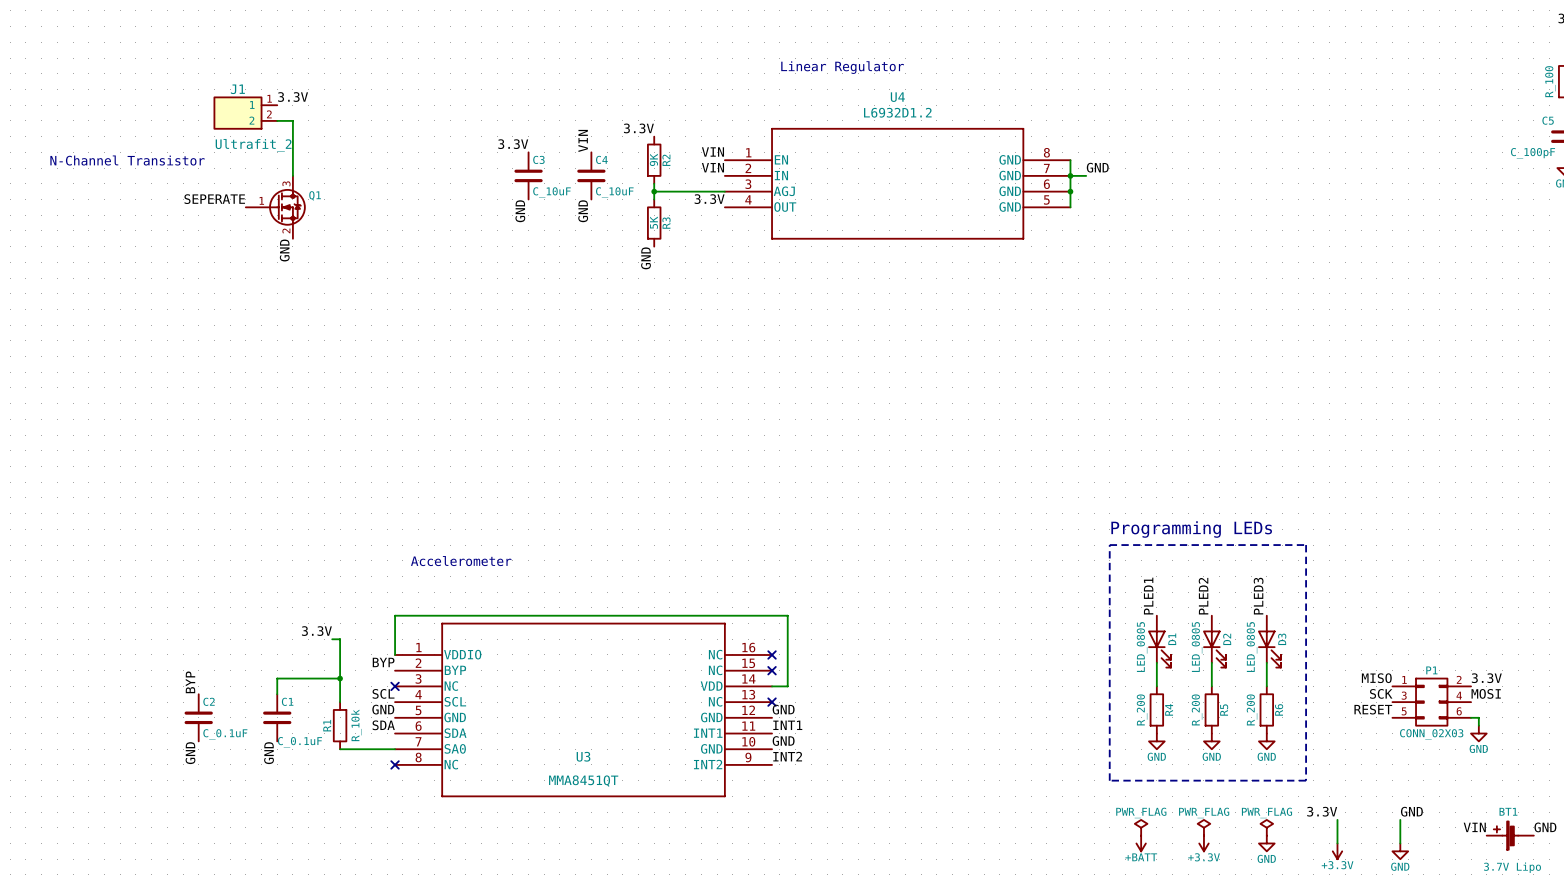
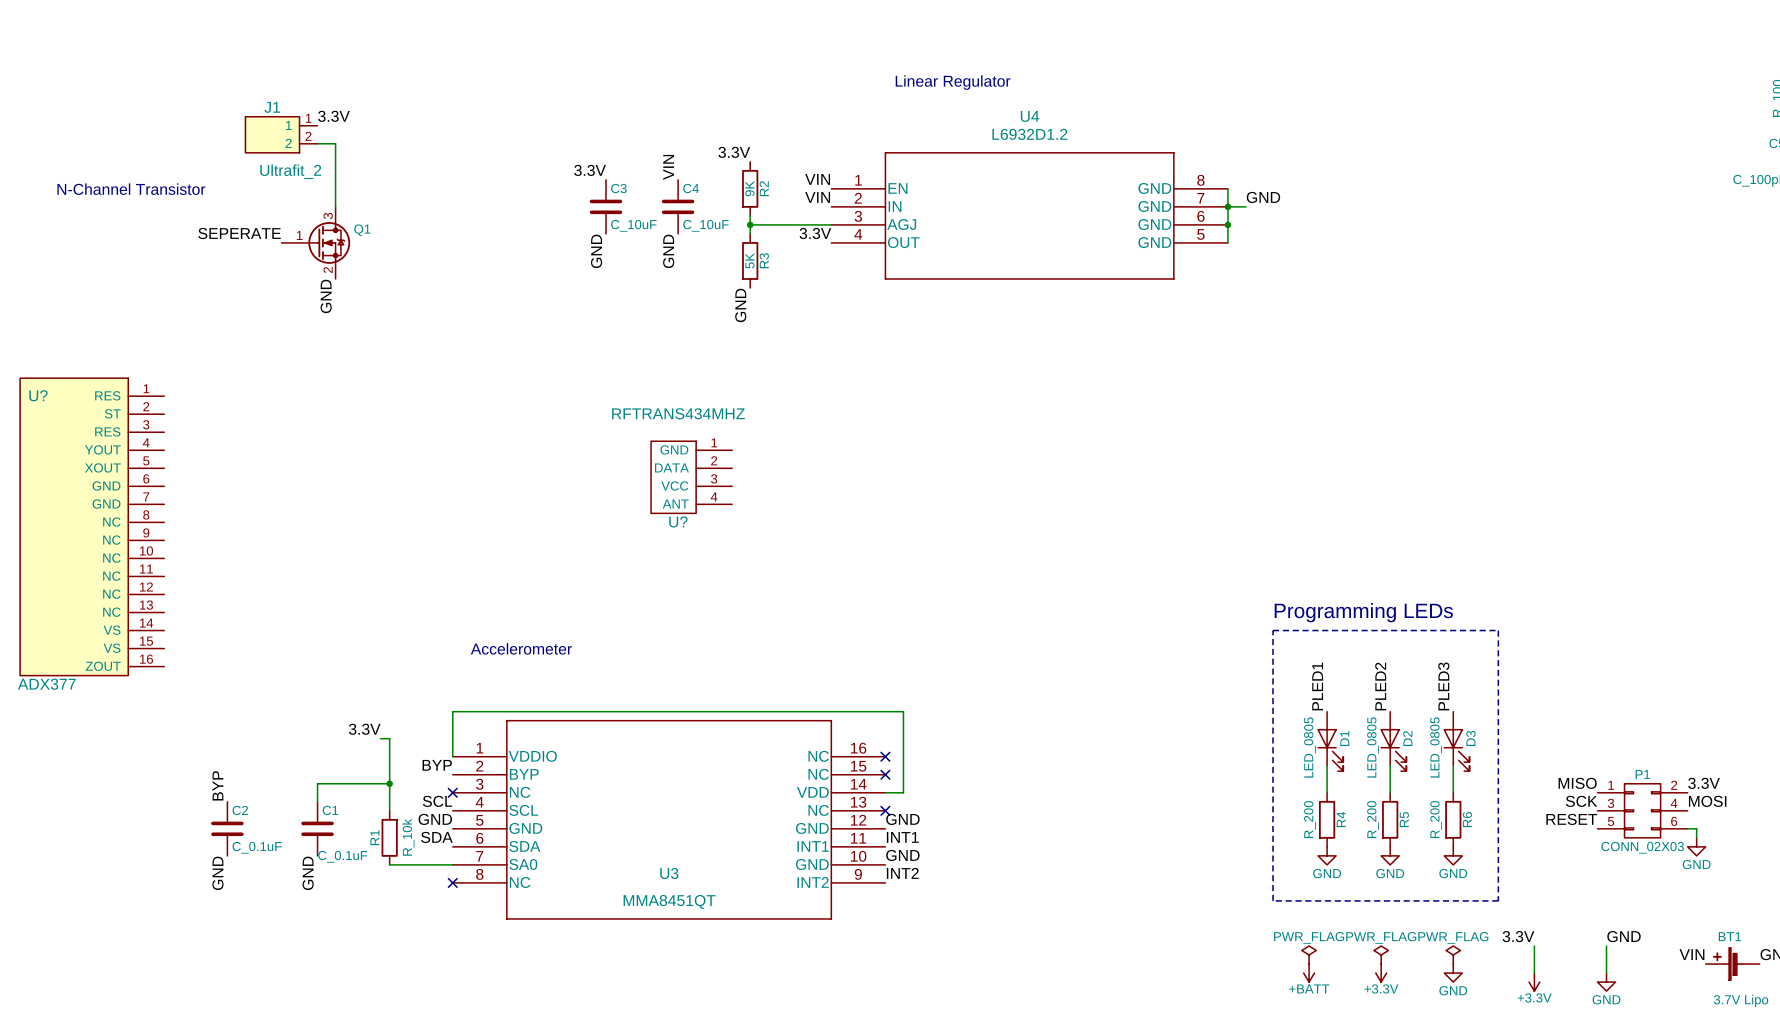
U?: none -> RFTRANS434MHZ (691, 477)
U?: none -> ADX377 (92, 526)

